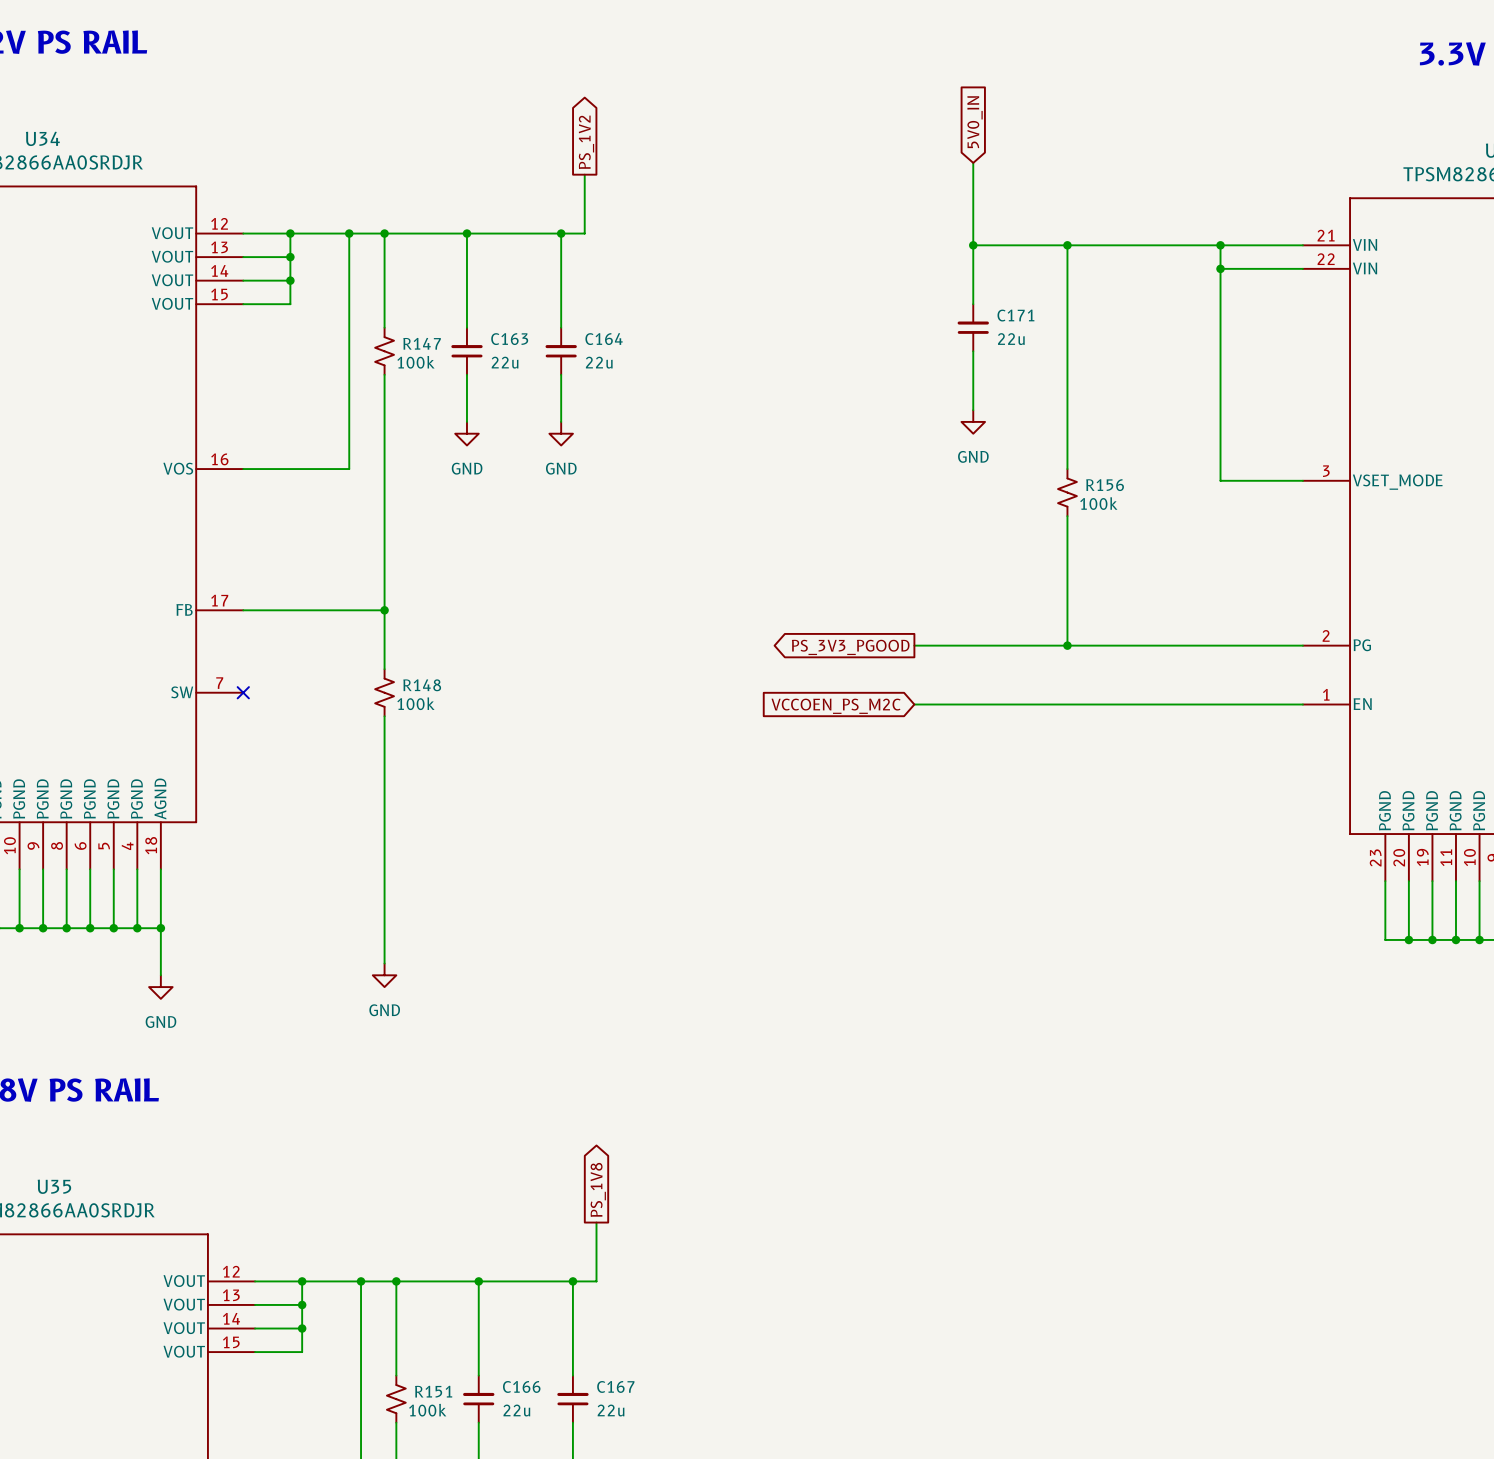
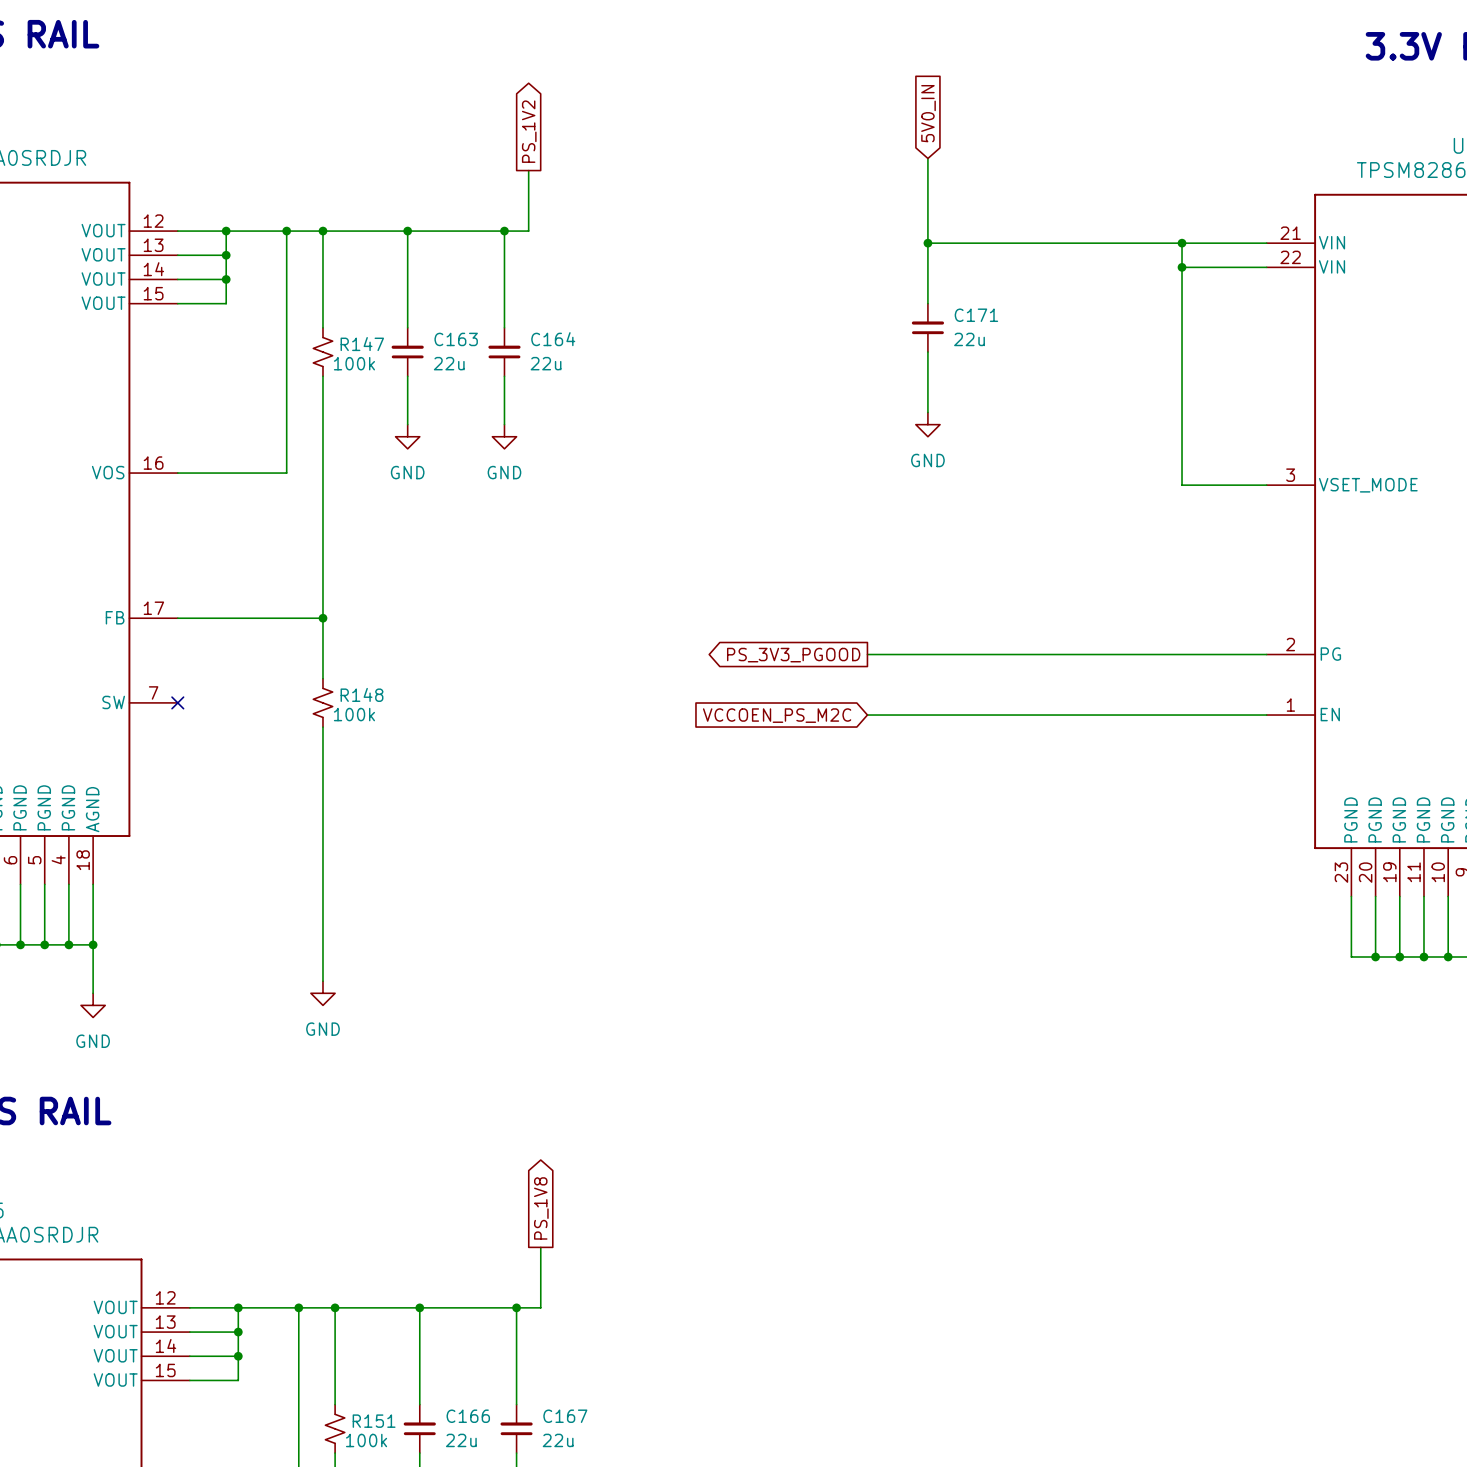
wire: (1067, 245) (1067, 469) -> none
junction: (1067, 245) -> none
R156: 100k (1067, 492) -> none
wire: (1067, 516) (1067, 645) -> none
junction: (1067, 645) -> none

